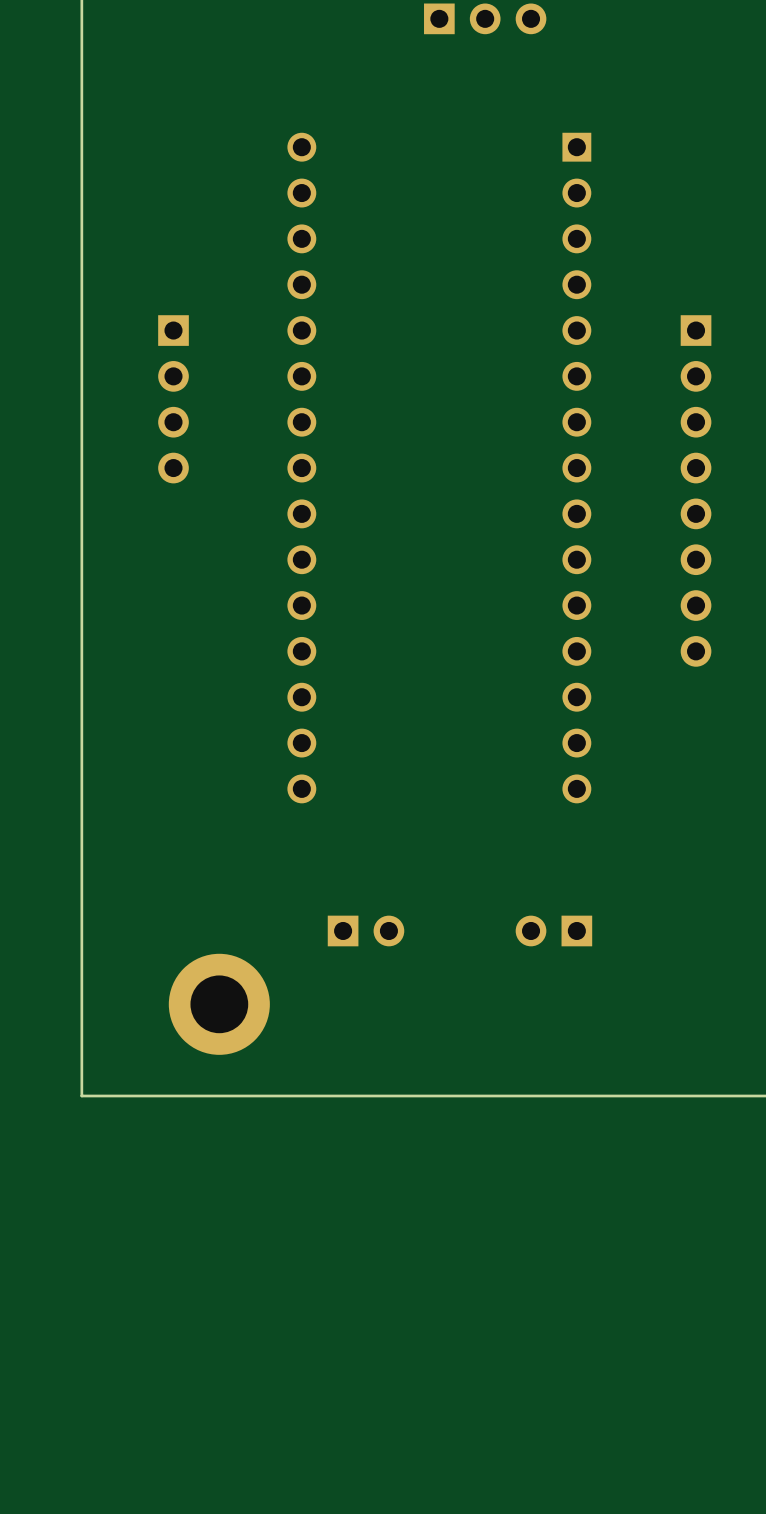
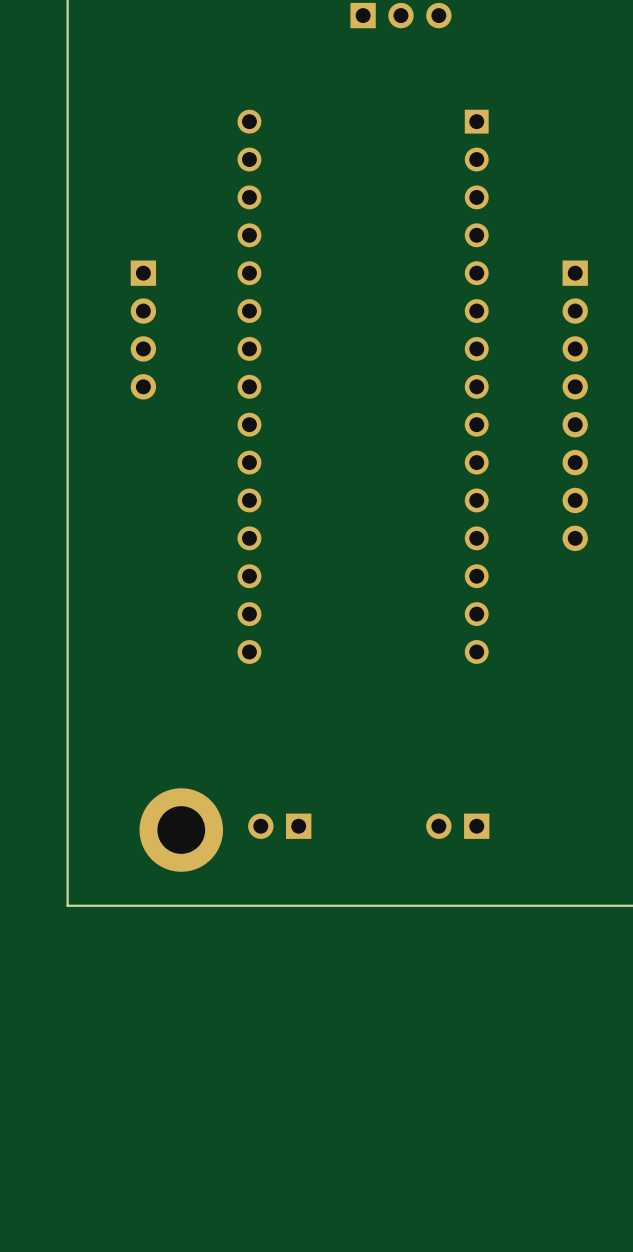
part rotation: 0° (366, 930) -> 180° (279, 826)
part position: (366, 930) -> (279, 826)
part position: (553, 930) -> (457, 826)

